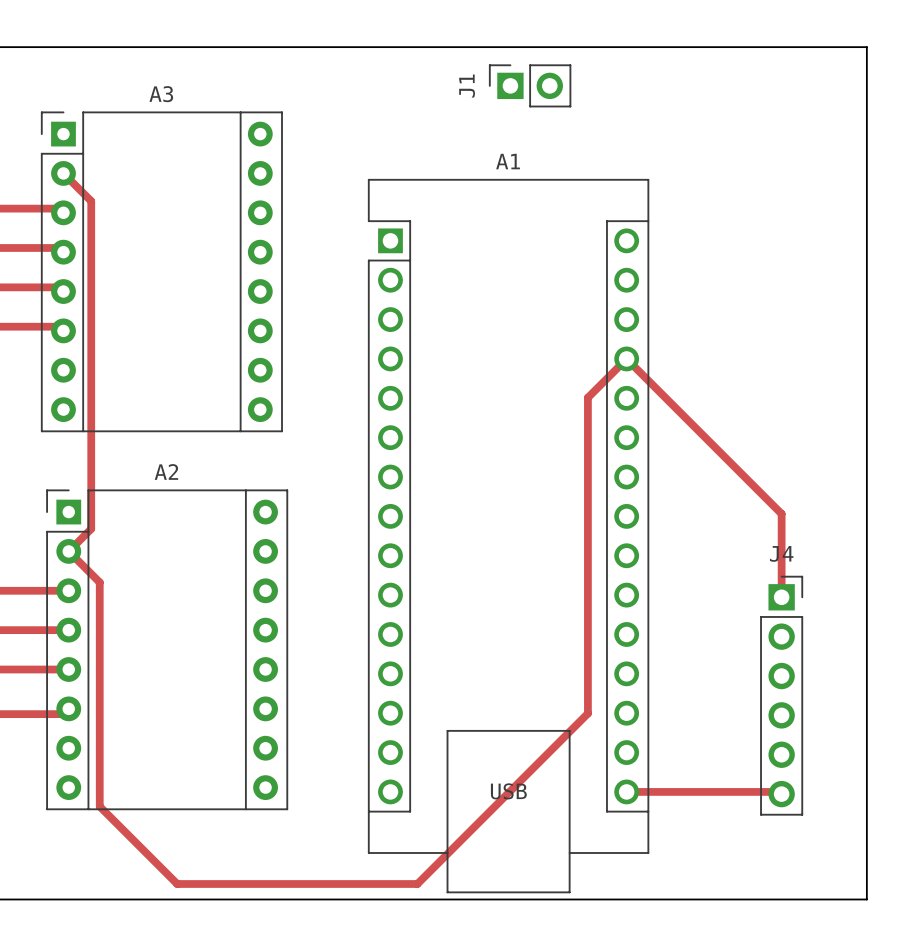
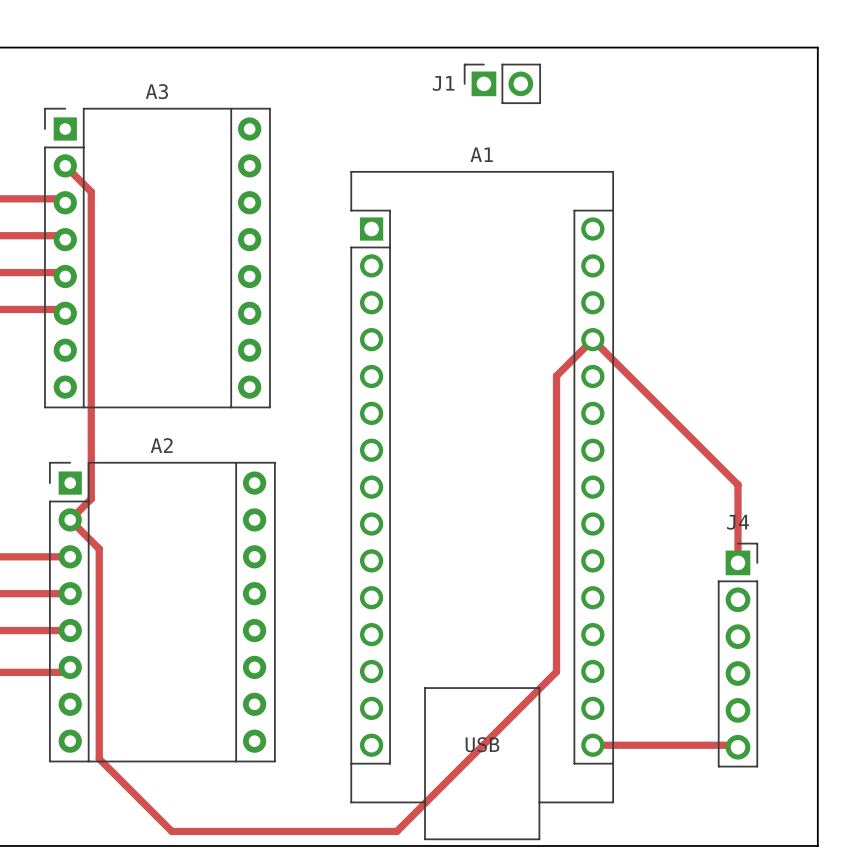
J1 name rotation: 0° (467, 86) -> 90° clockwise (443, 83)

